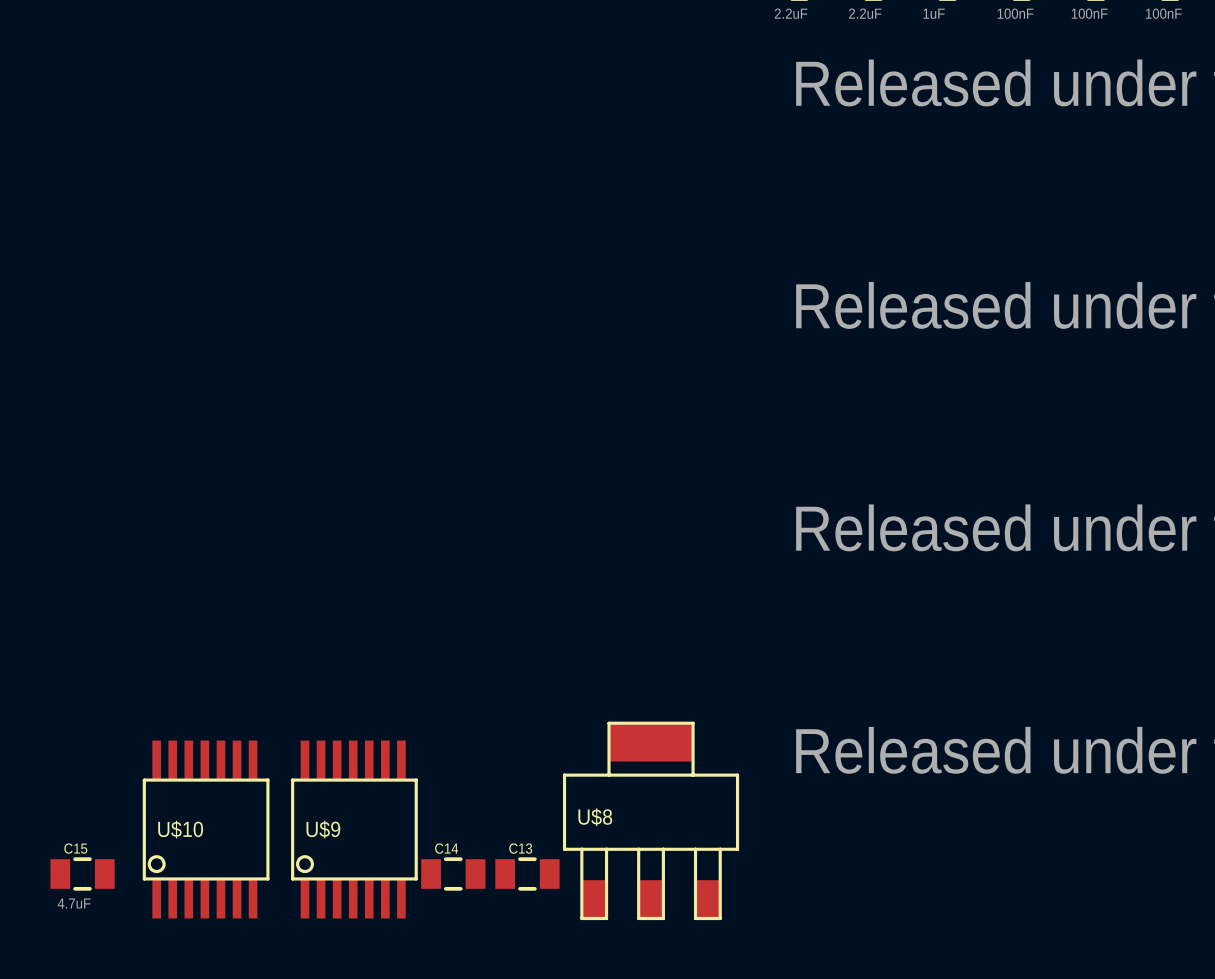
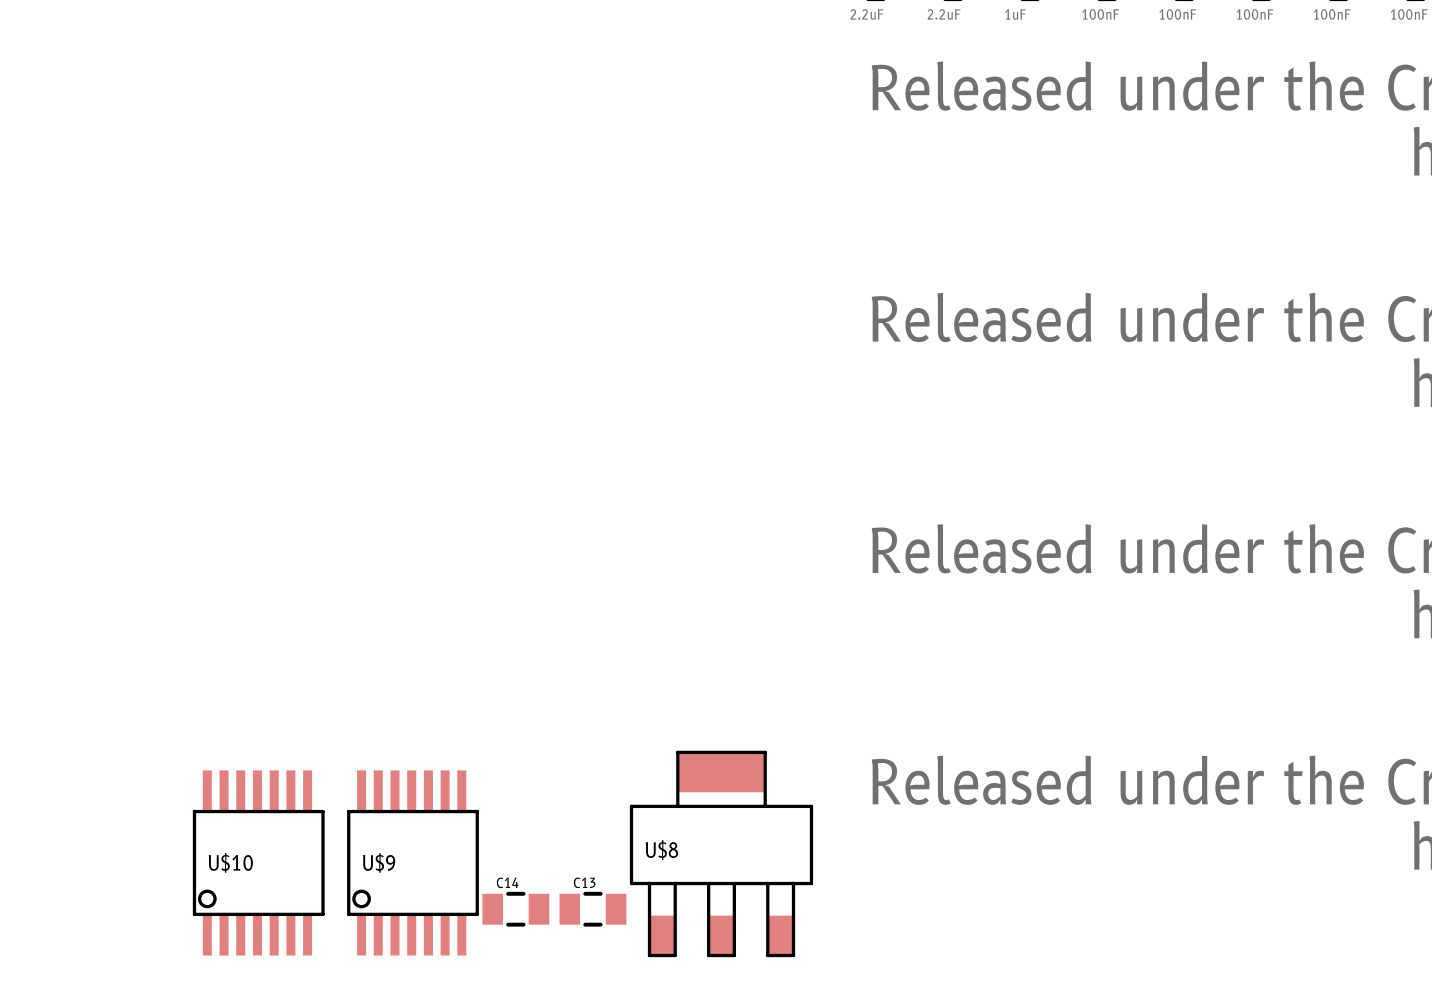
C15: 4.7uF (82, 874) -> none

